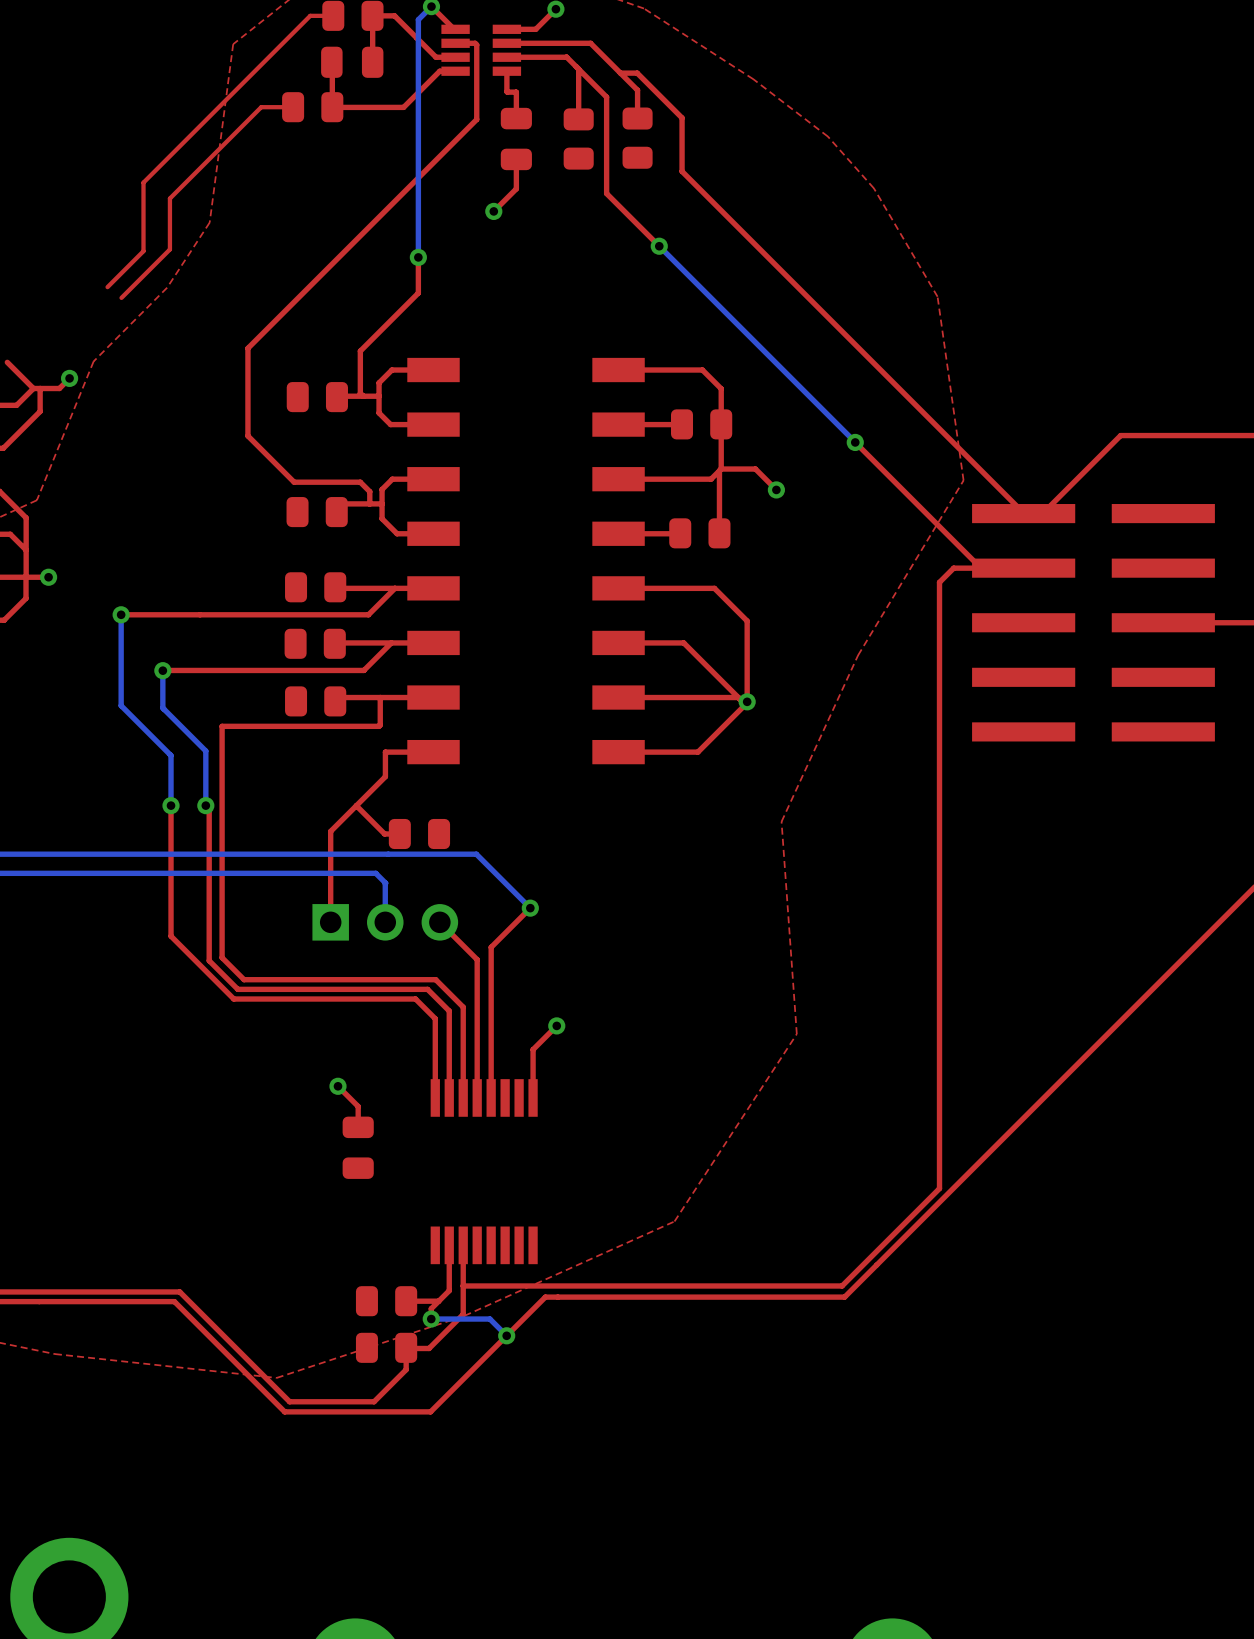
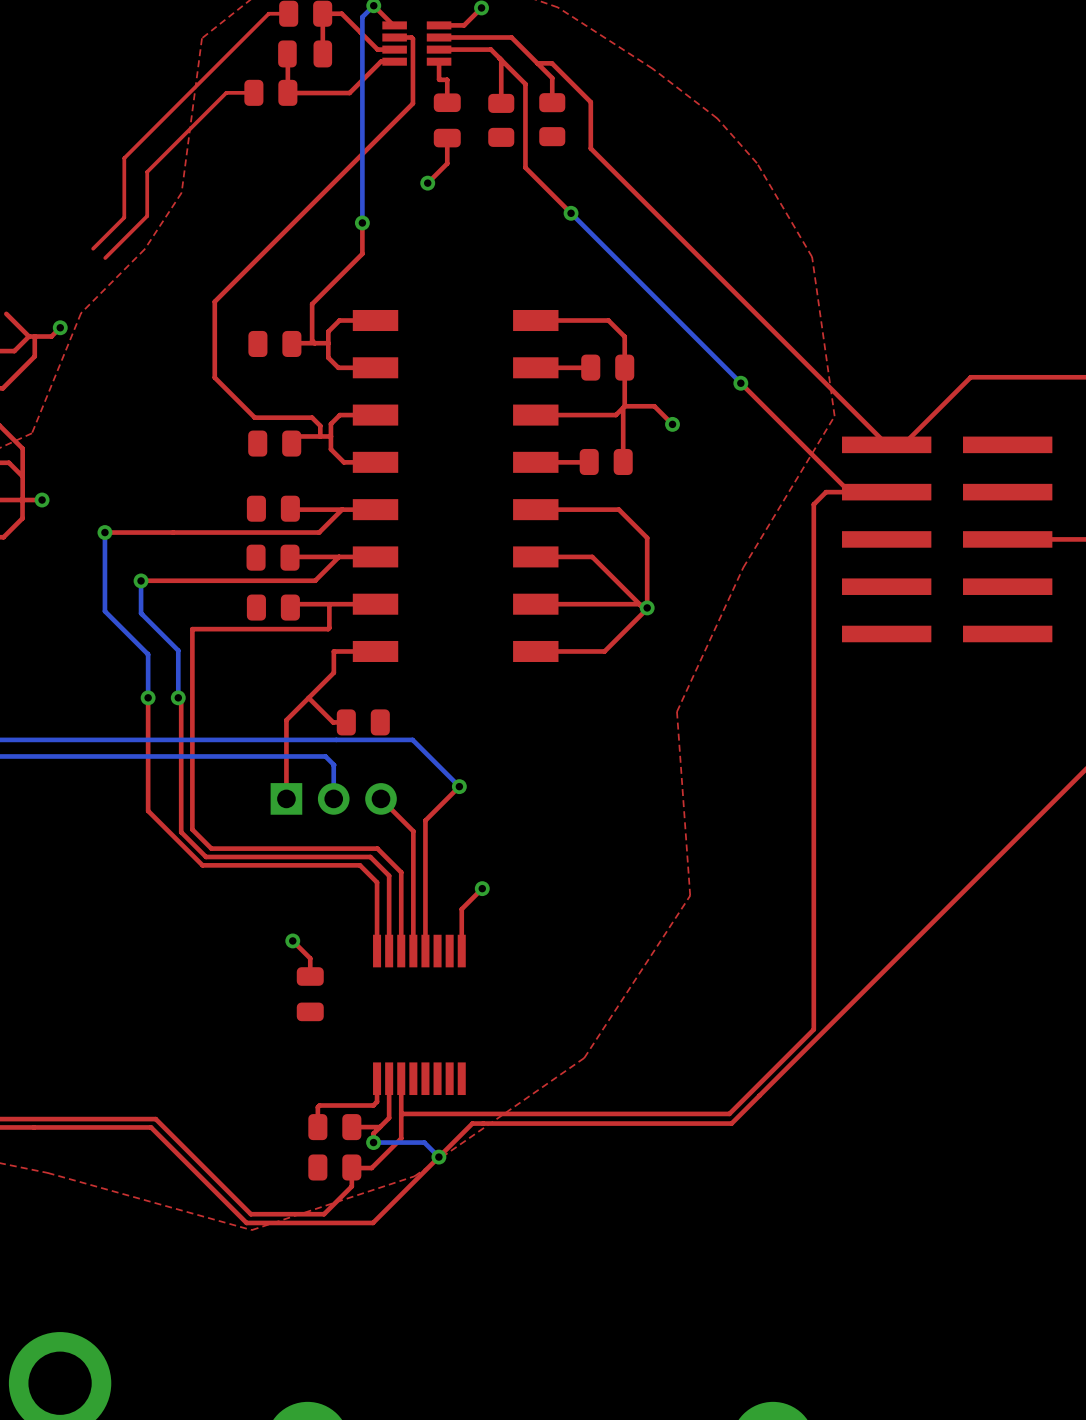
top zone outline: (674, 1221) (464, 1315) (276, 1377) (54, 1354) -> (584, 1058) (414, 1176) (251, 1230) (47, 1172)
top track: none -> (377, 1078) (377, 1101) (373, 1105) (319, 1105) (317, 1107) (317, 1127)

